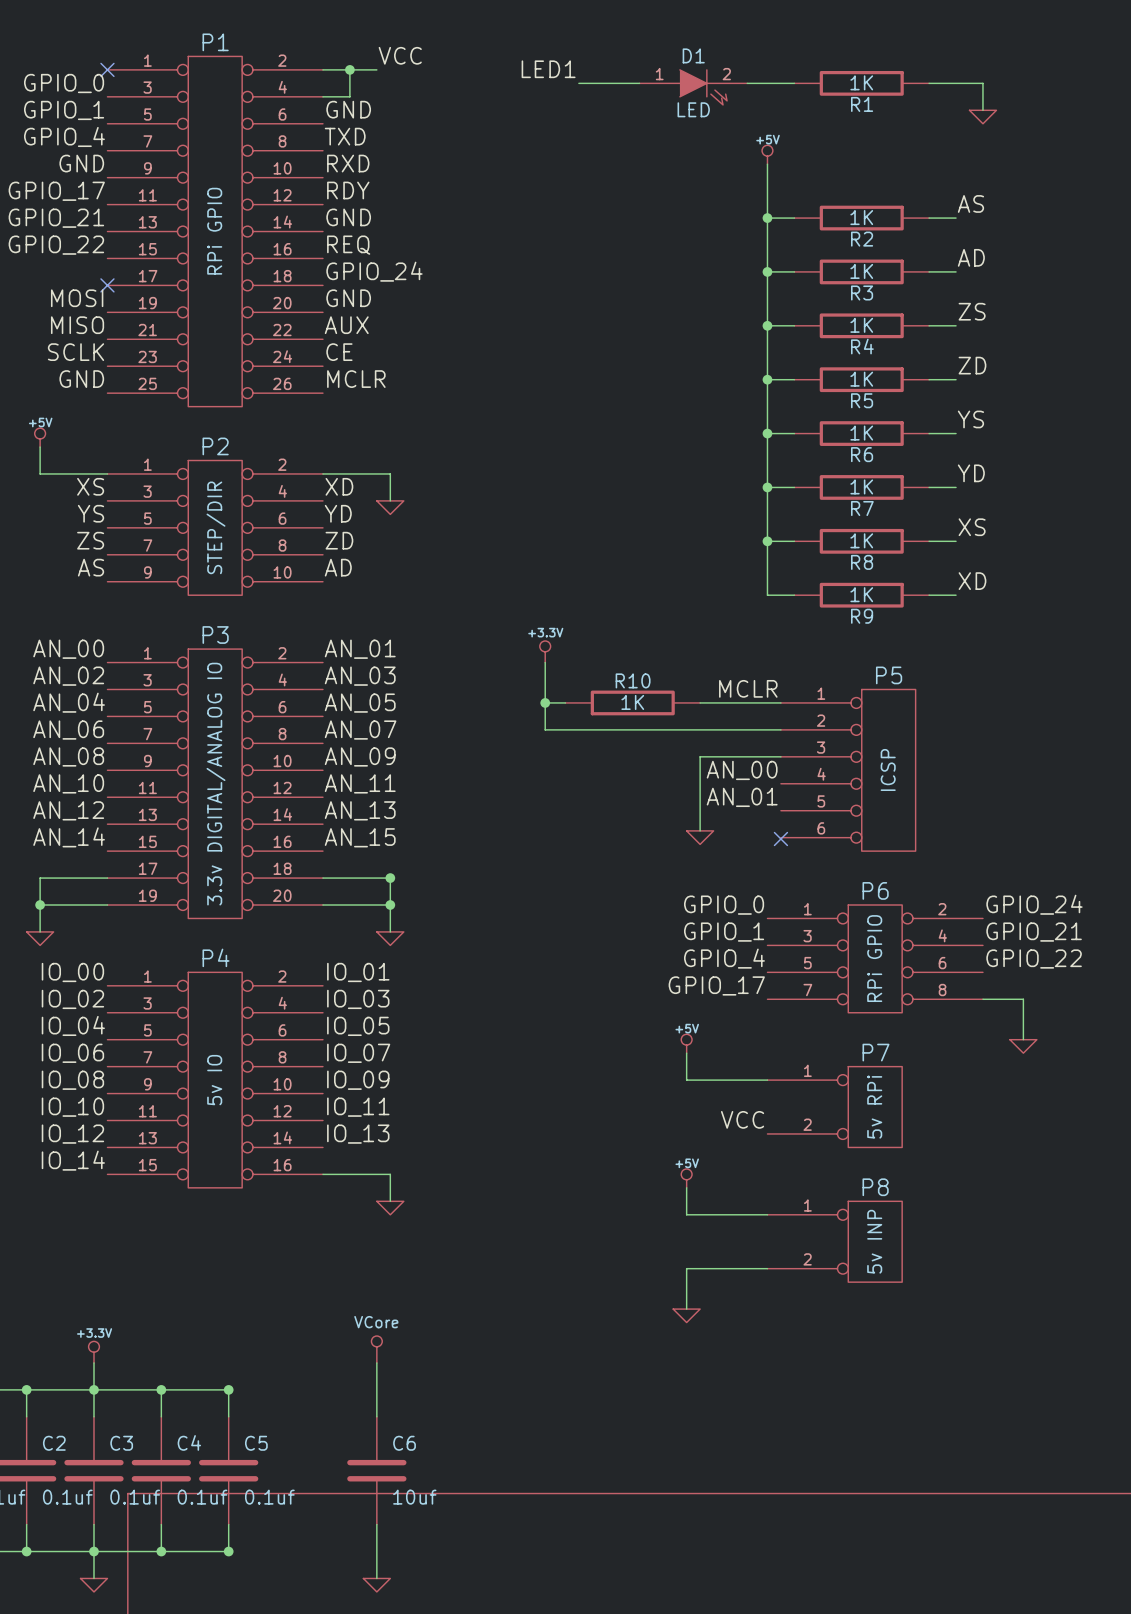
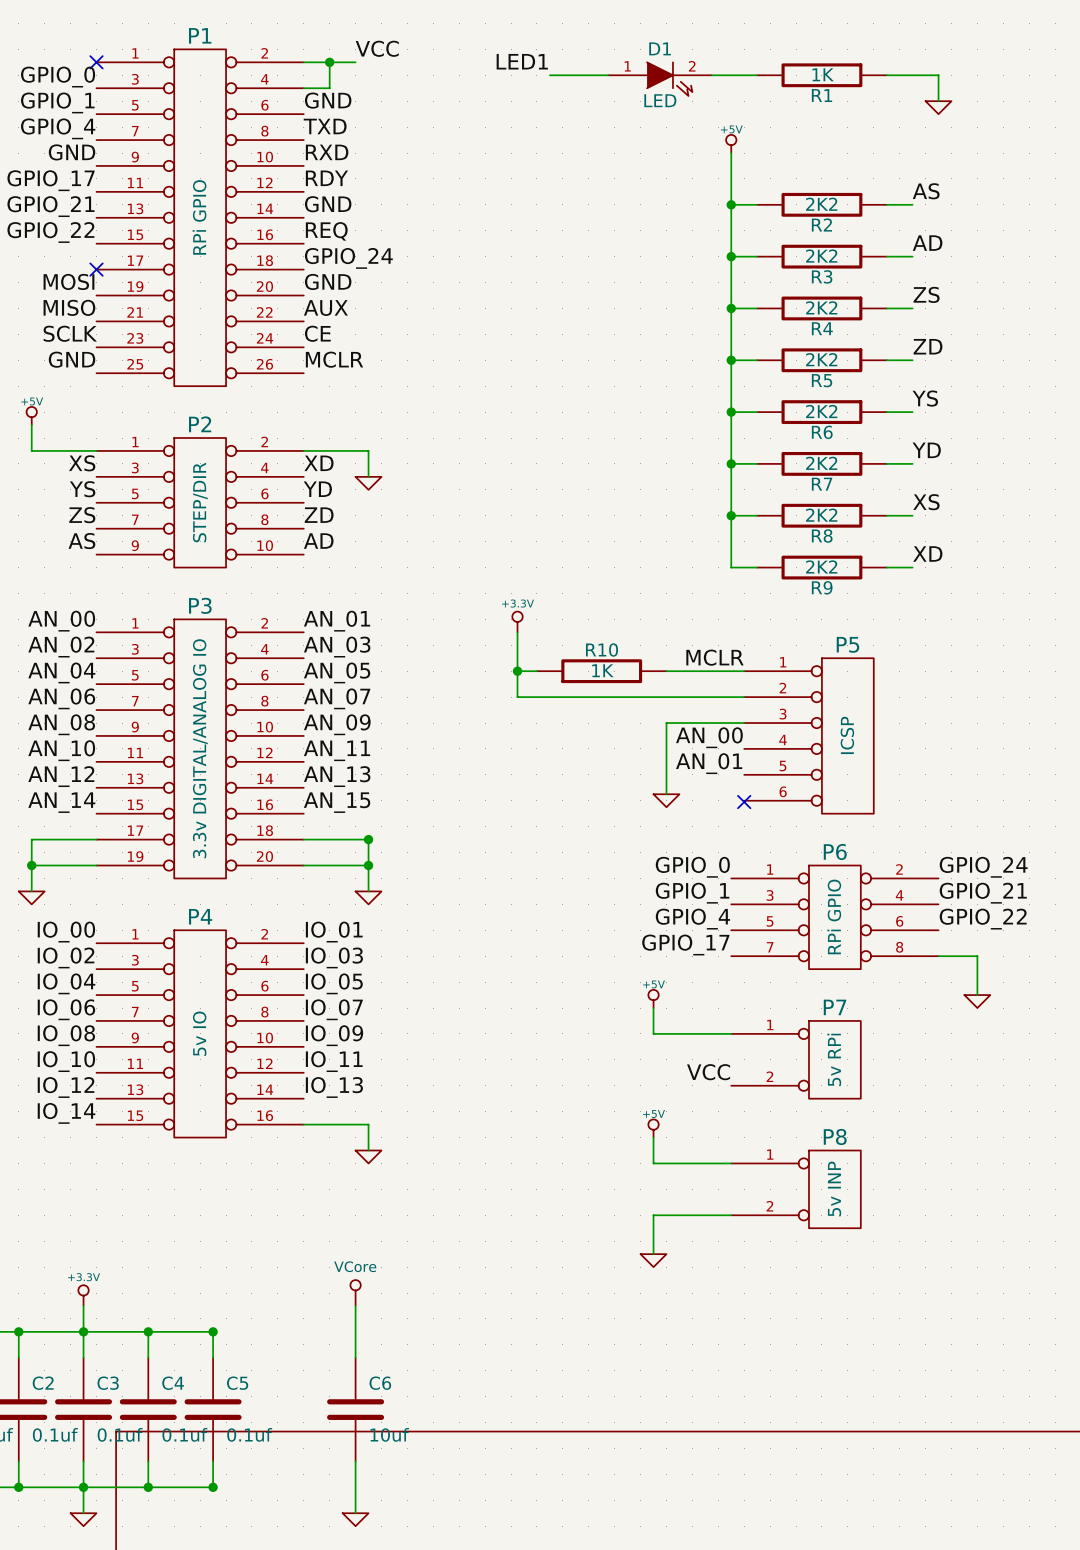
R2 value: 1K (861, 217) -> 2K2 (821, 204)
R3 value: 1K (861, 271) -> 2K2 (821, 256)
R4 value: 1K (861, 325) -> 2K2 (821, 307)
R5 value: 1K (861, 379) -> 2K2 (821, 359)
R6 value: 1K (861, 433) -> 2K2 (821, 411)
R7 value: 1K (861, 486) -> 2K2 (821, 463)
R8 value: 1K (861, 540) -> 2K2 (821, 515)
R9 value: 1K (861, 594) -> 2K2 (821, 566)

